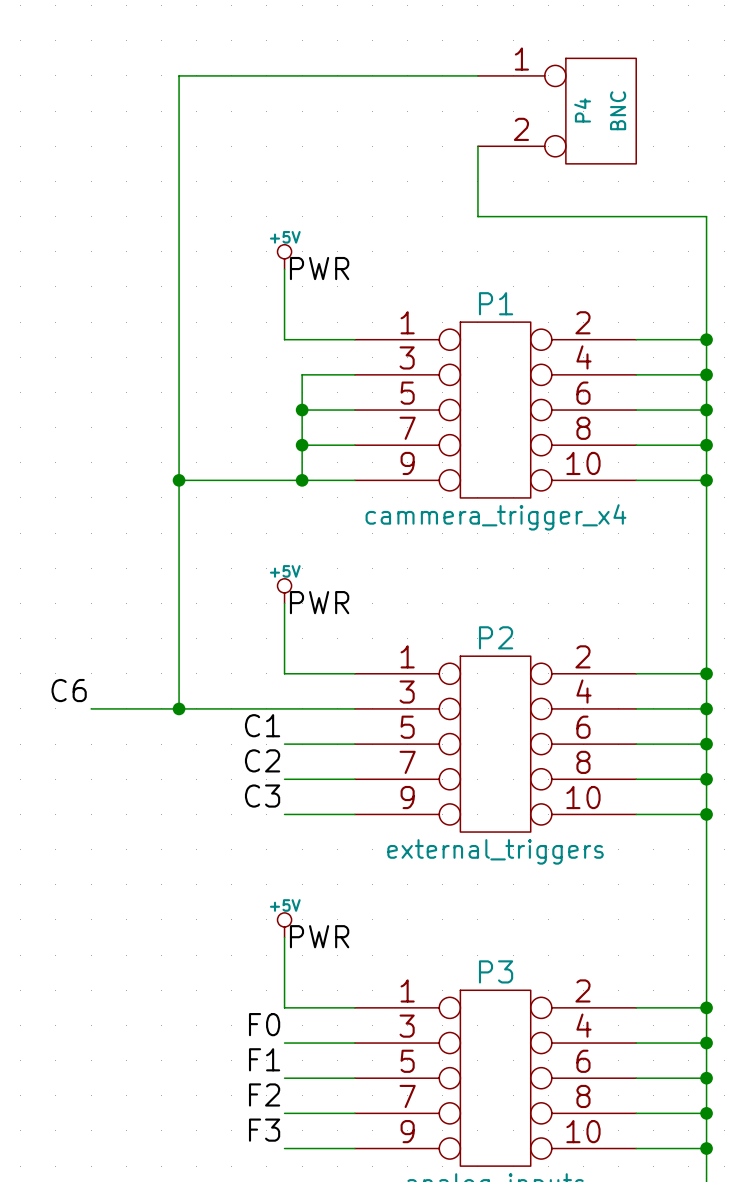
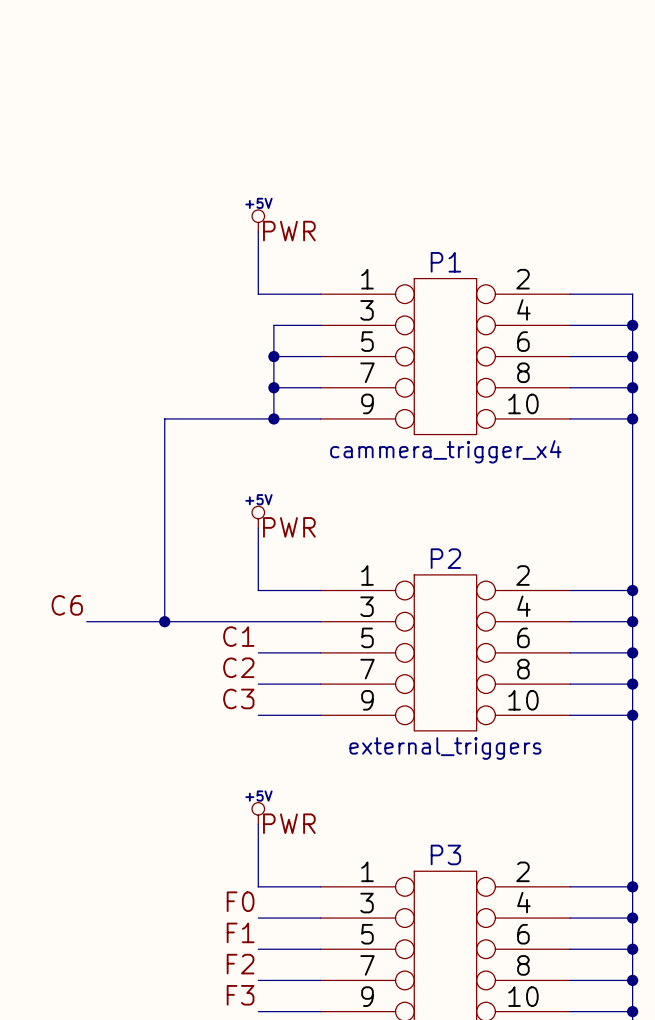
wire: (477, 75) (179, 75) (179, 480) -> none
P4: BNC (557, 111) -> none
wire: (477, 146) (477, 216) (706, 216) (706, 339) -> none
junction: (706, 339) -> none
junction: (179, 480) -> none

